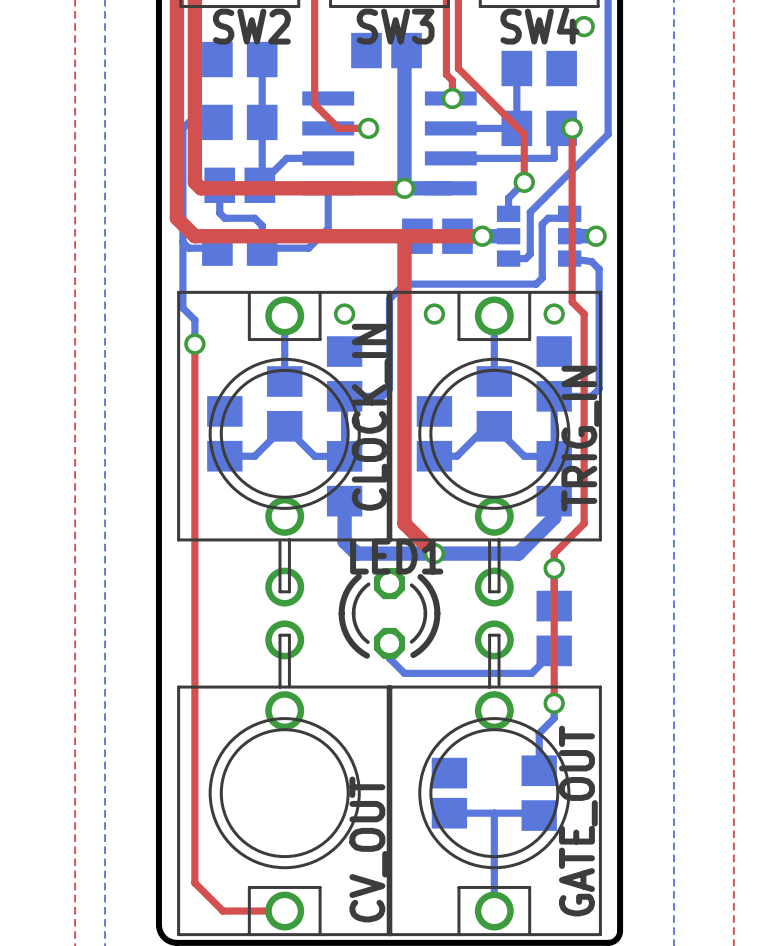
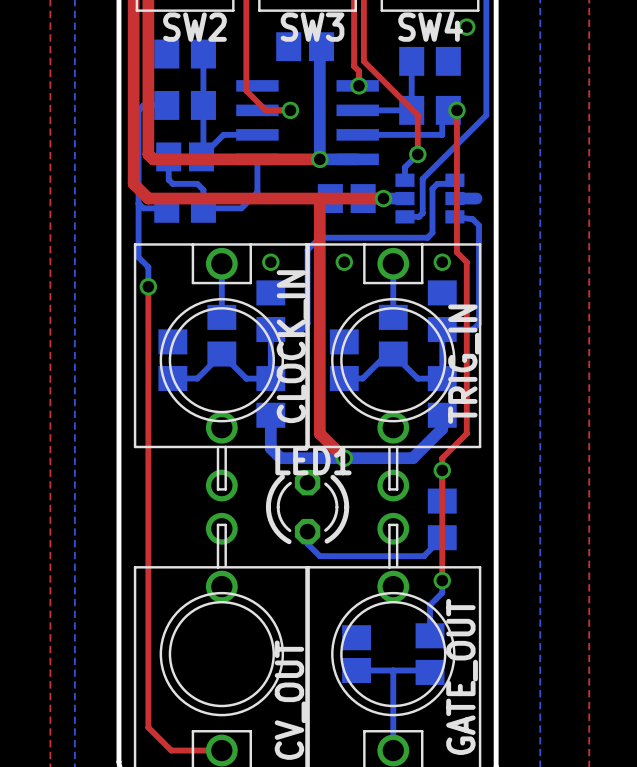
via: (596, 236) -> none

